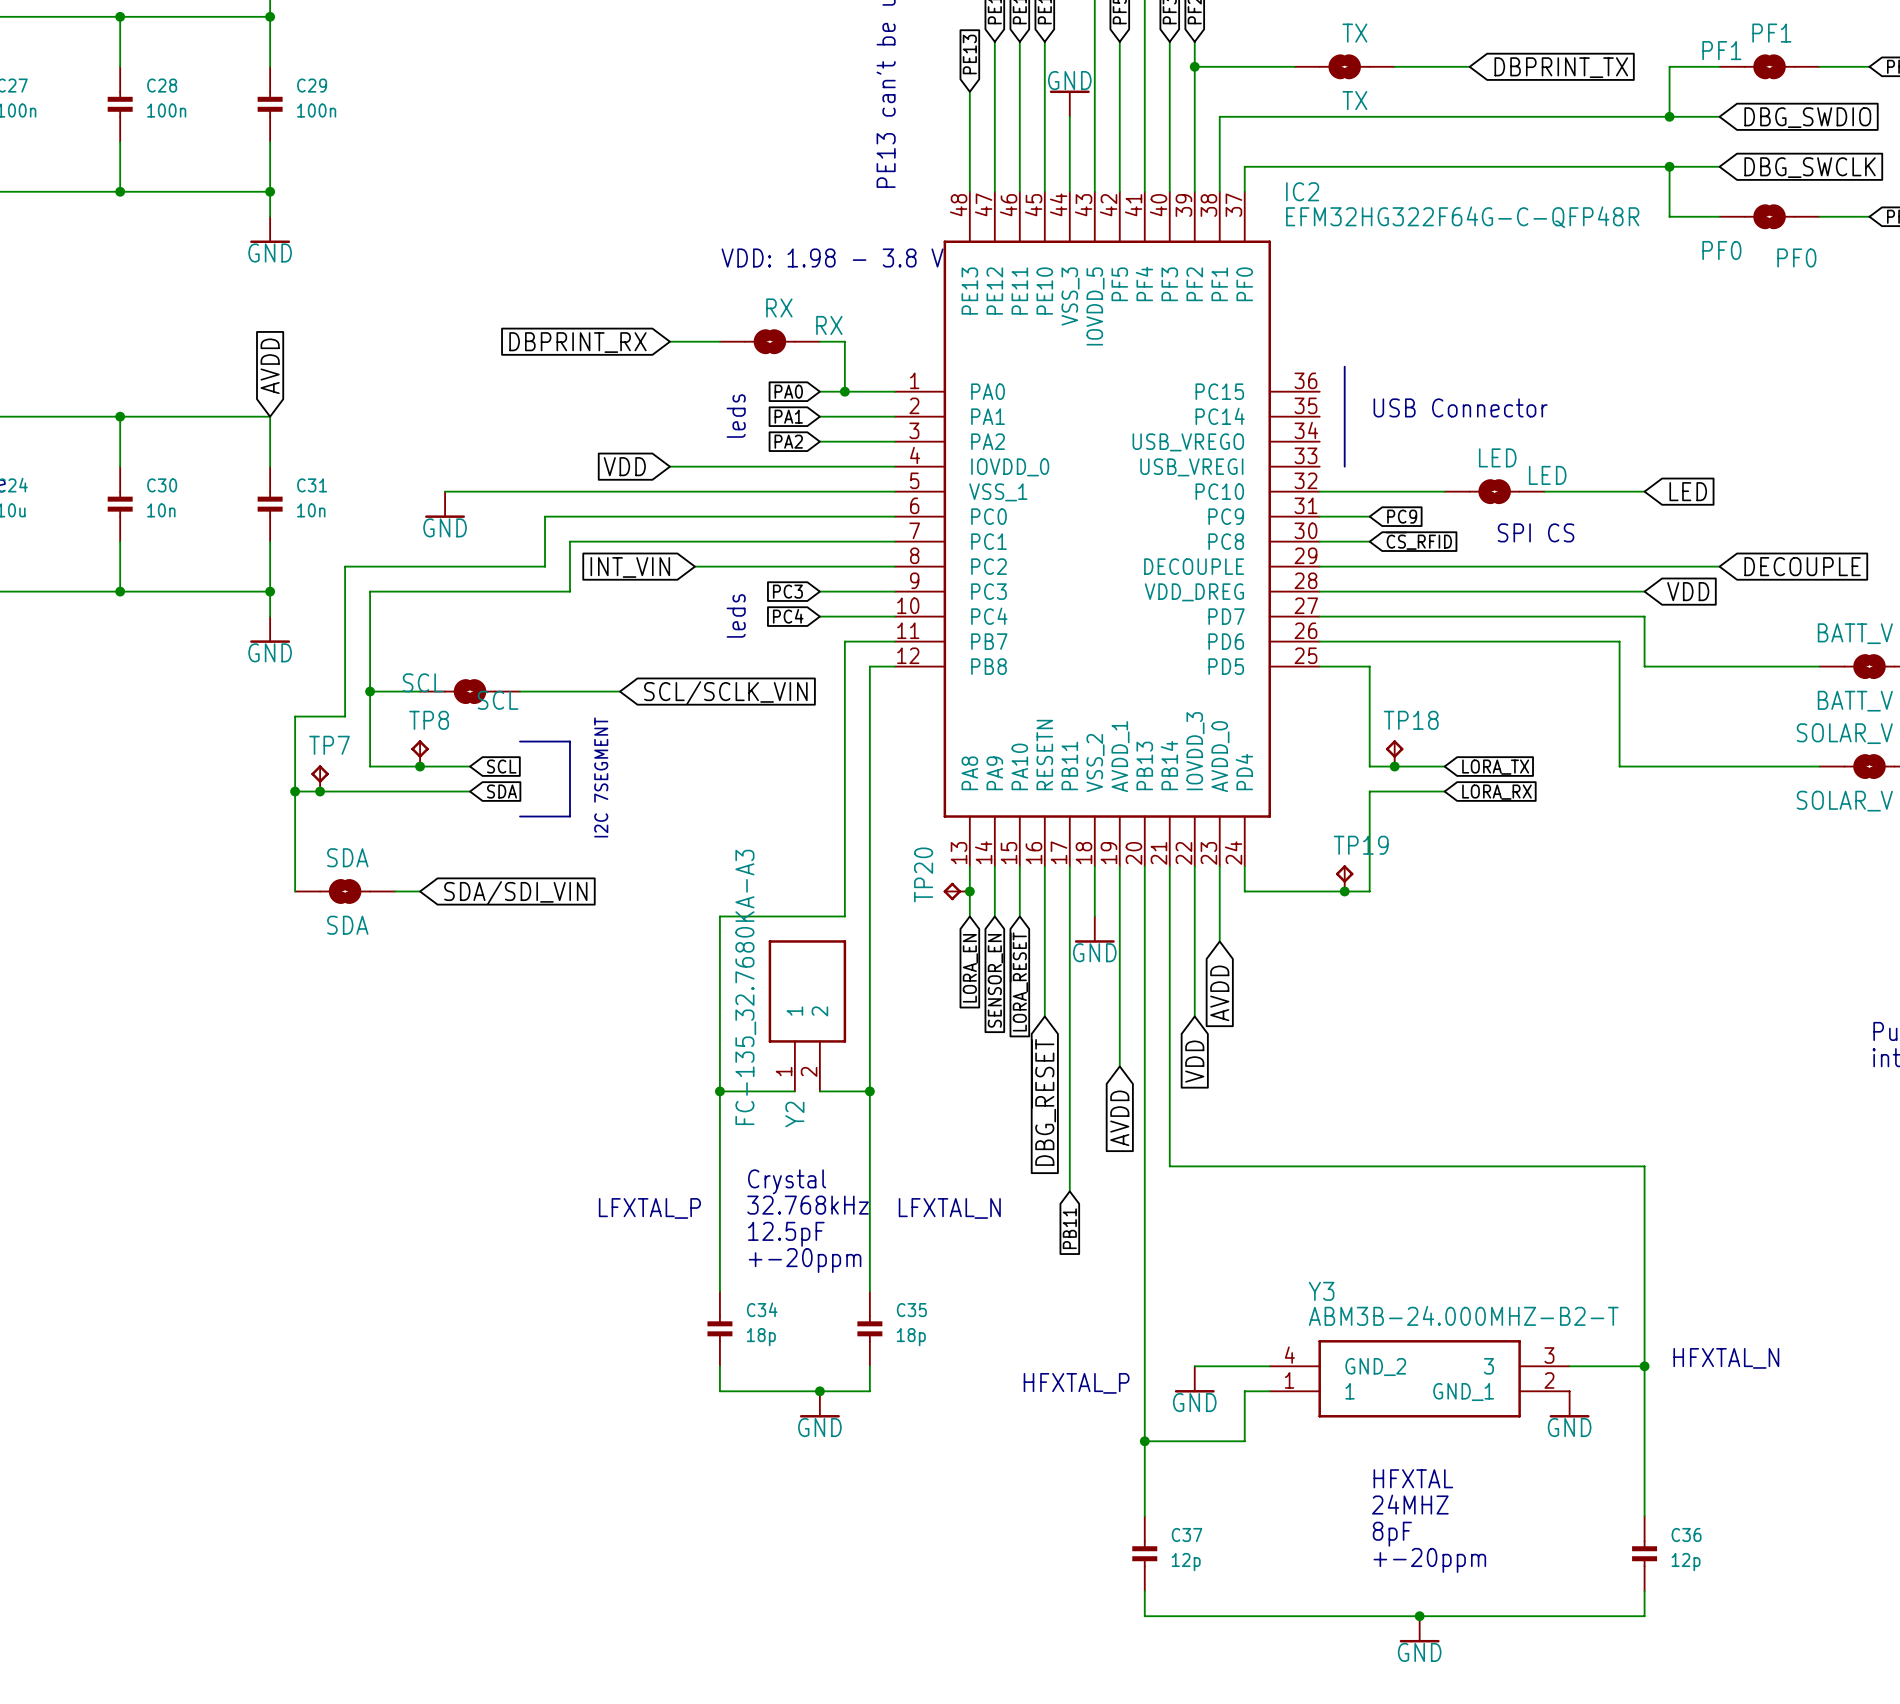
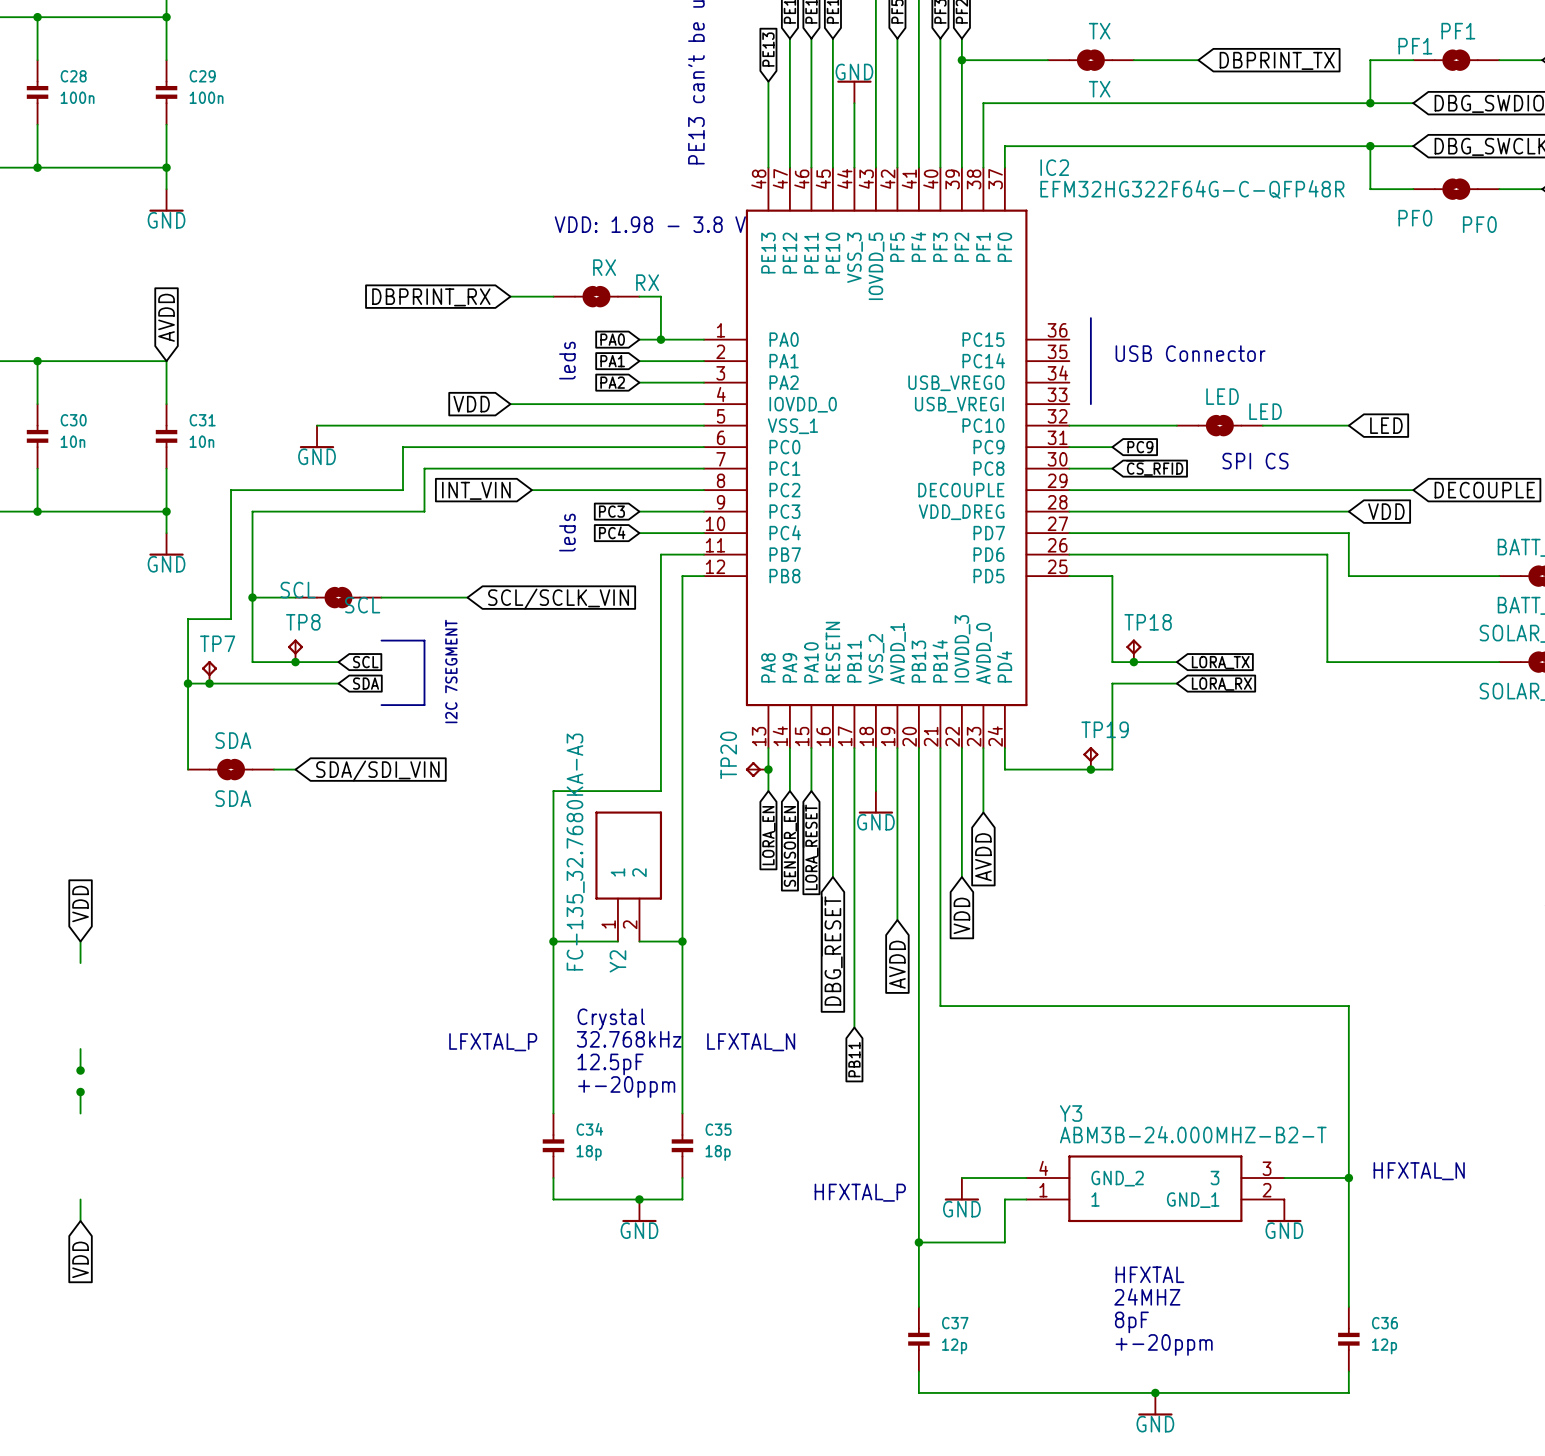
global label: none -> VDD (80, 903)
wire: none -> (80, 941) (80, 963)
wire: none -> (80, 1049) (80, 1070)
junction: none -> (80, 1070)
wire: none -> (80, 1092) (80, 1113)
junction: none -> (80, 1092)
wire: none -> (80, 1199) (80, 1221)
global label: none -> VDD (80, 1259)

